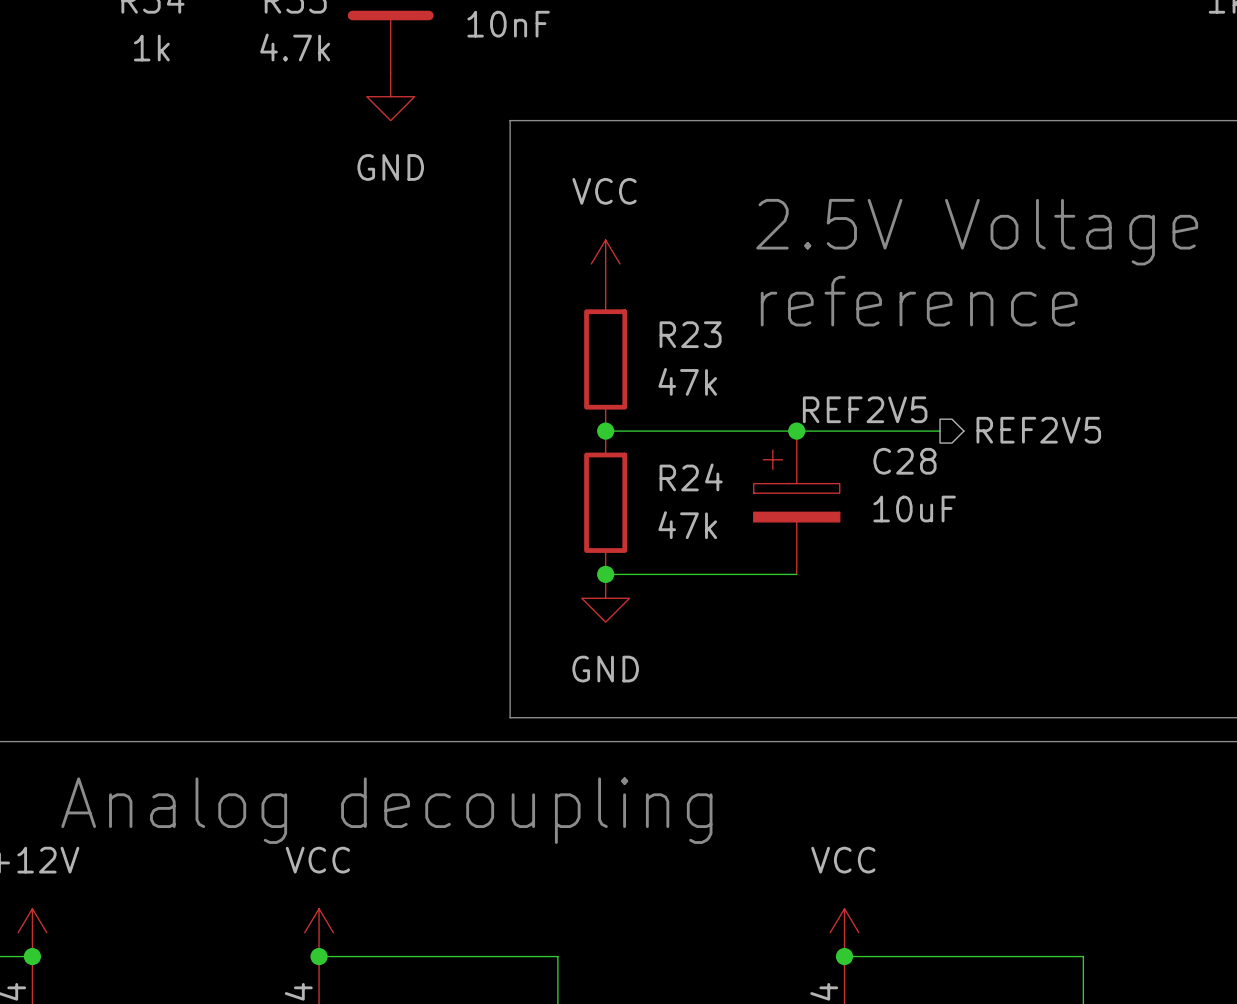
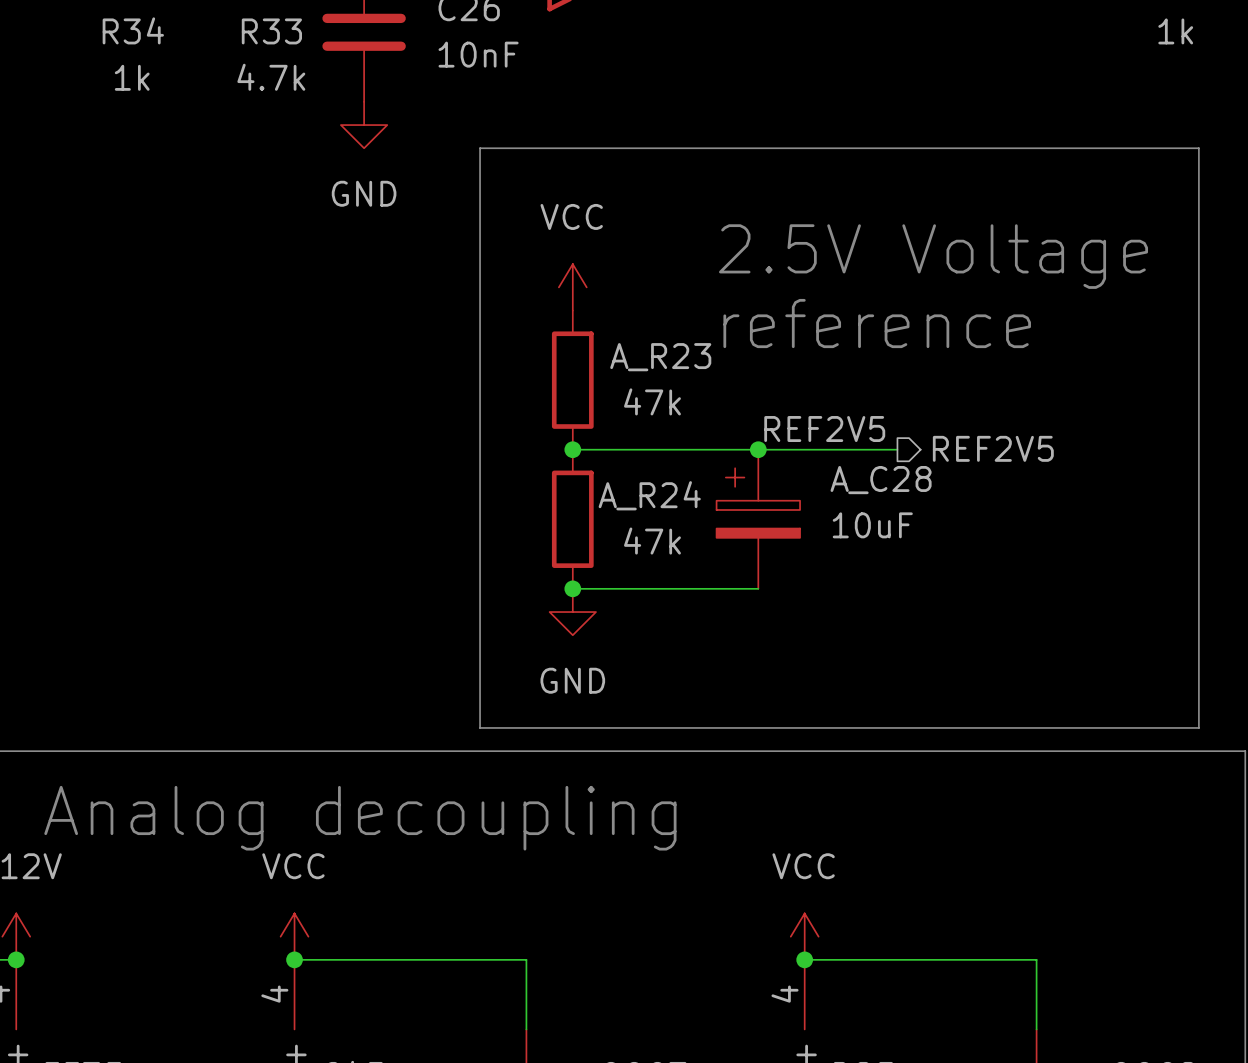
R23 name: R23 (690, 334) -> A_R23 (660, 357)
C28 name: C28 (904, 461) -> A_C28 (881, 480)
R24 name: R24 (691, 477) -> A_R24 (649, 495)

